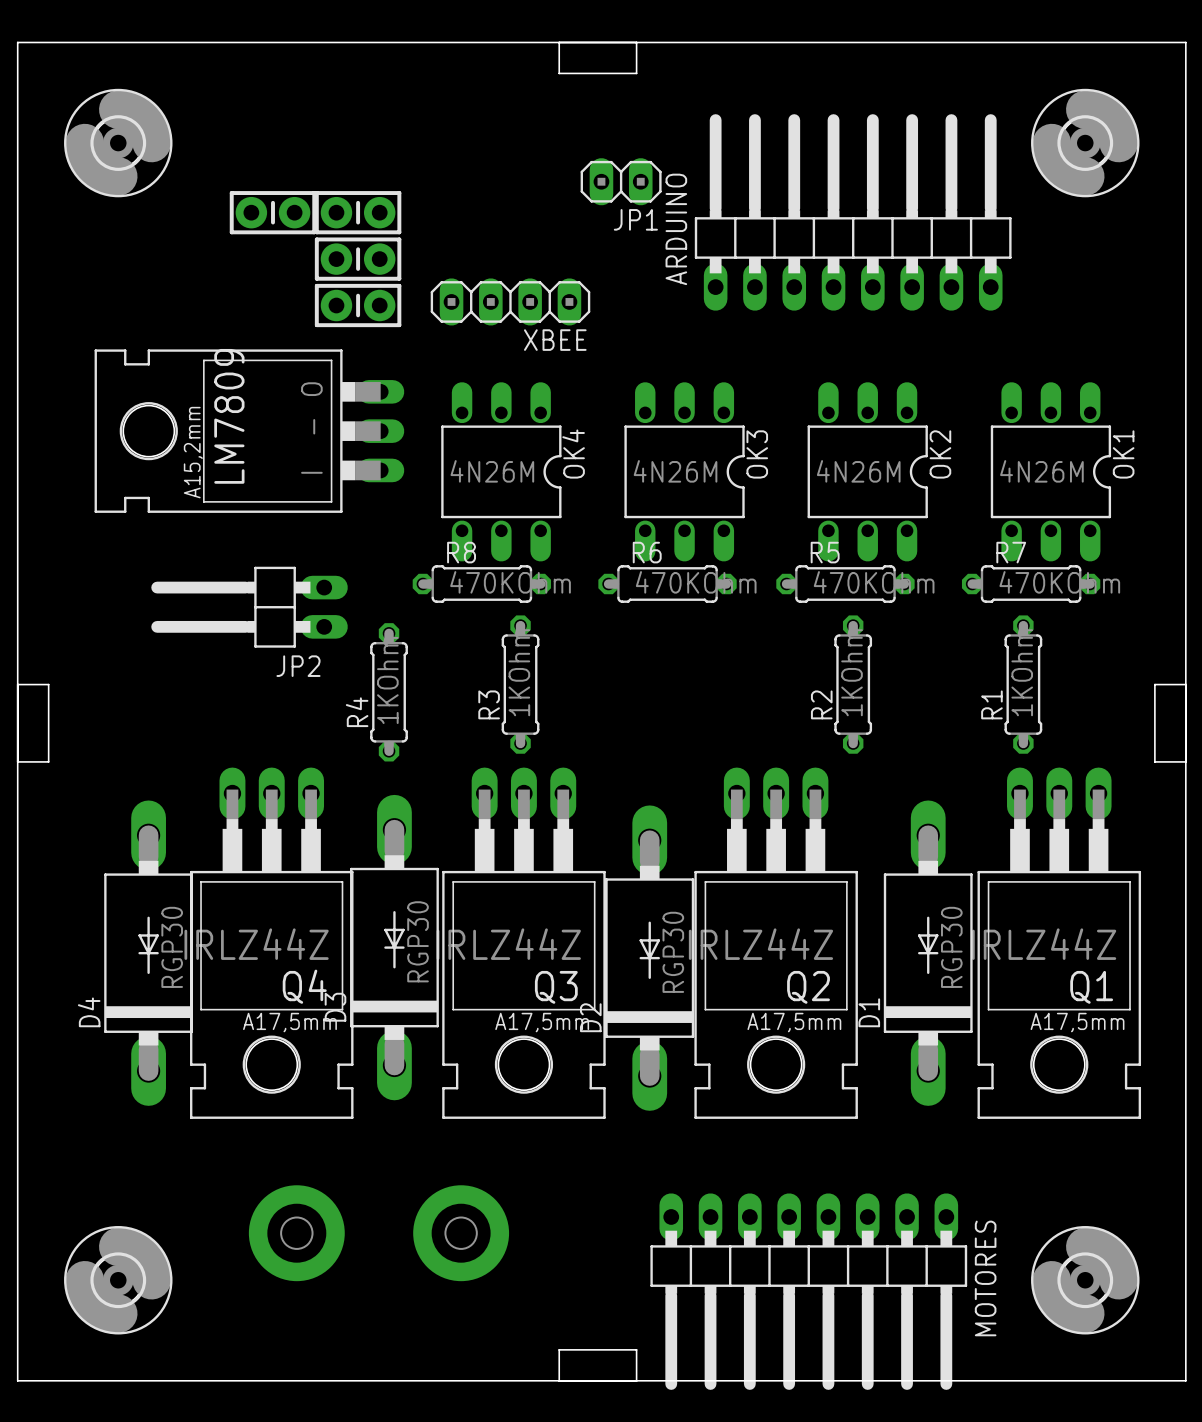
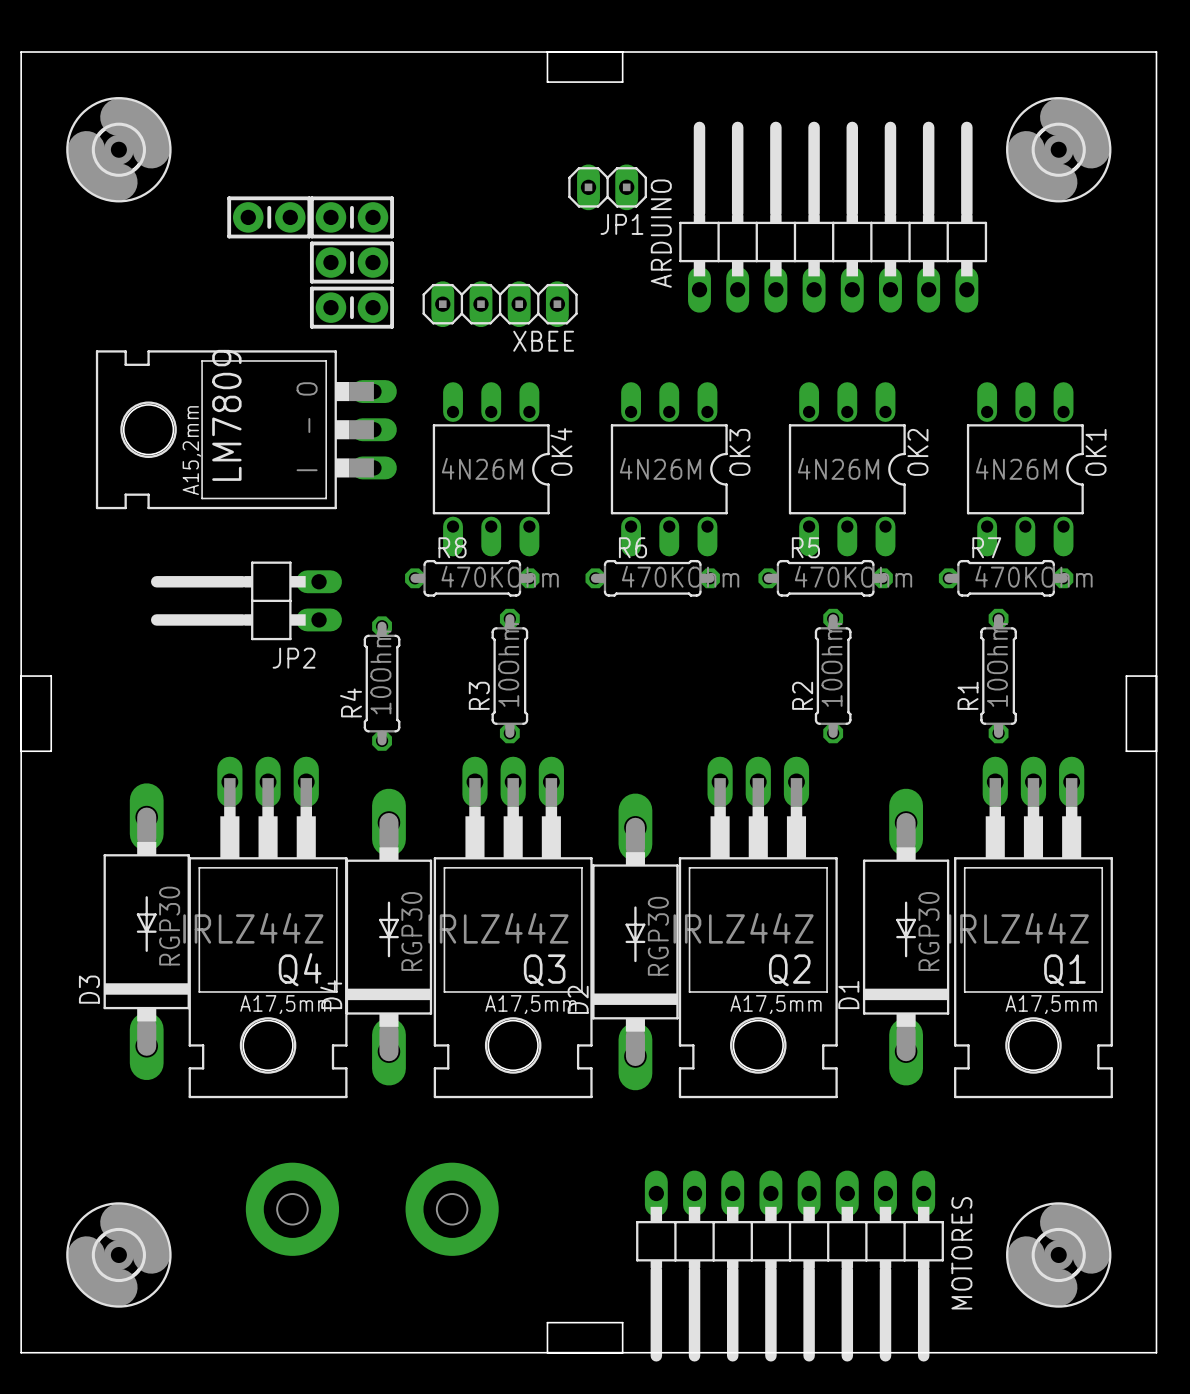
R3 value: 1KOhm (519, 672) -> 10Ohm (508, 664)
R2 value: 1KOhm (852, 672) -> 10Ohm (832, 664)
R1 value: 1KOhm (1022, 672) -> 10Ohm (997, 664)
R4 value: 1KOhm (387, 680) -> 10Ohm (380, 672)
D3 position: (394, 947) -> (146, 931)
D4 position: (148, 953) -> (388, 937)

